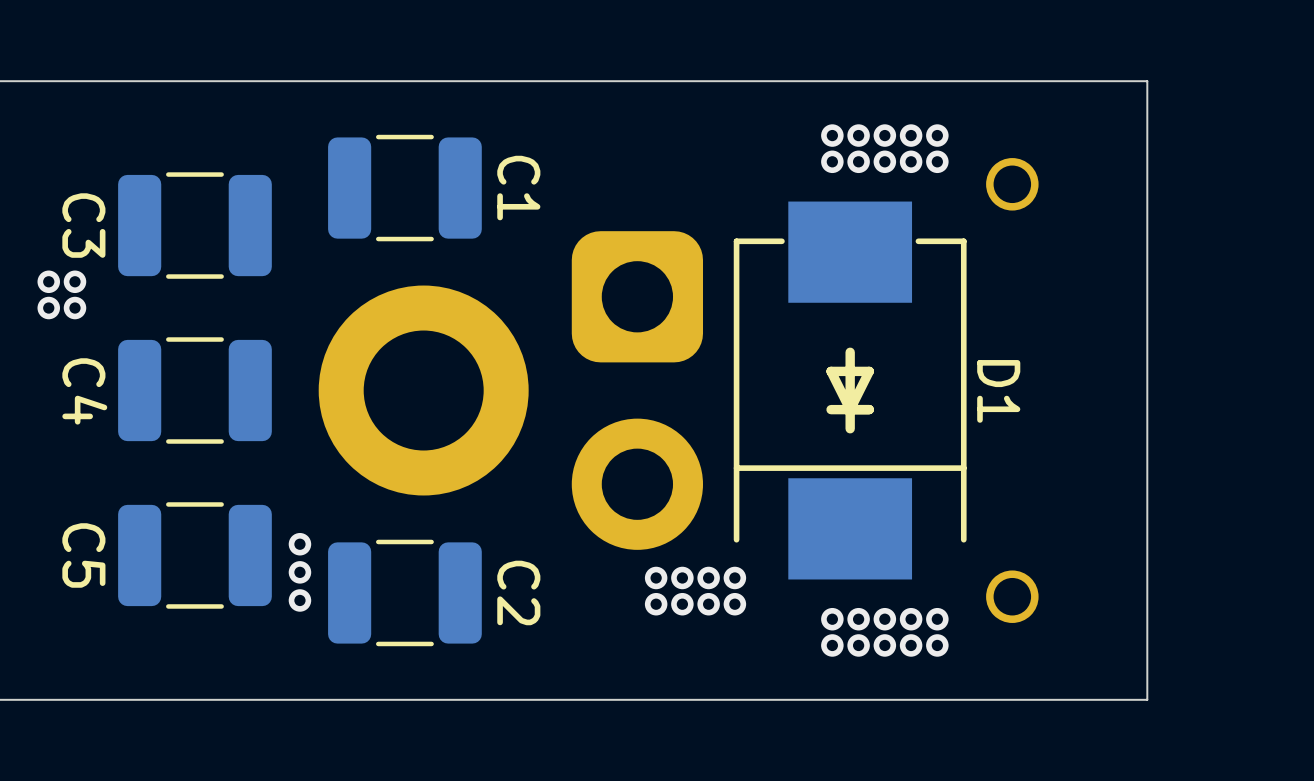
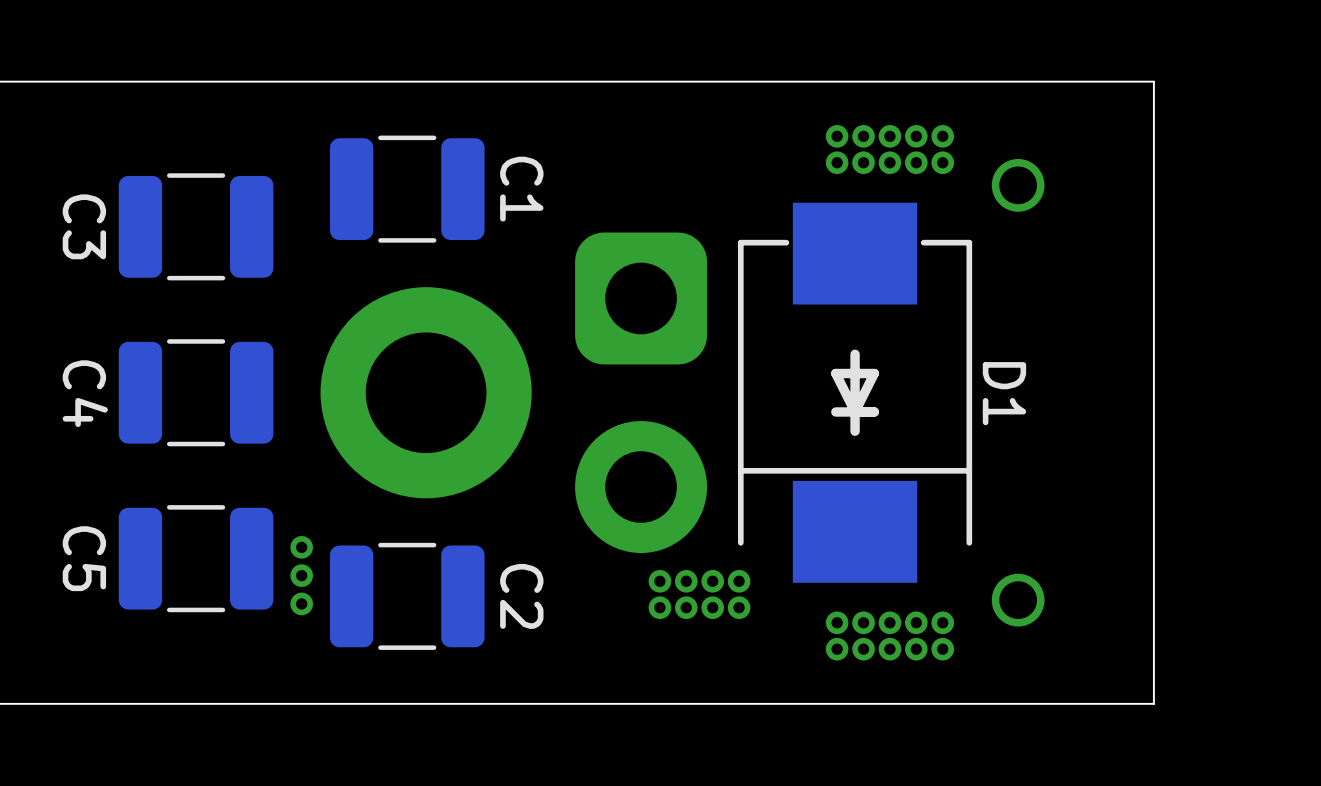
via: (48, 281) -> none
via: (74, 281) -> none
via: (48, 308) -> none
via: (74, 308) -> none

